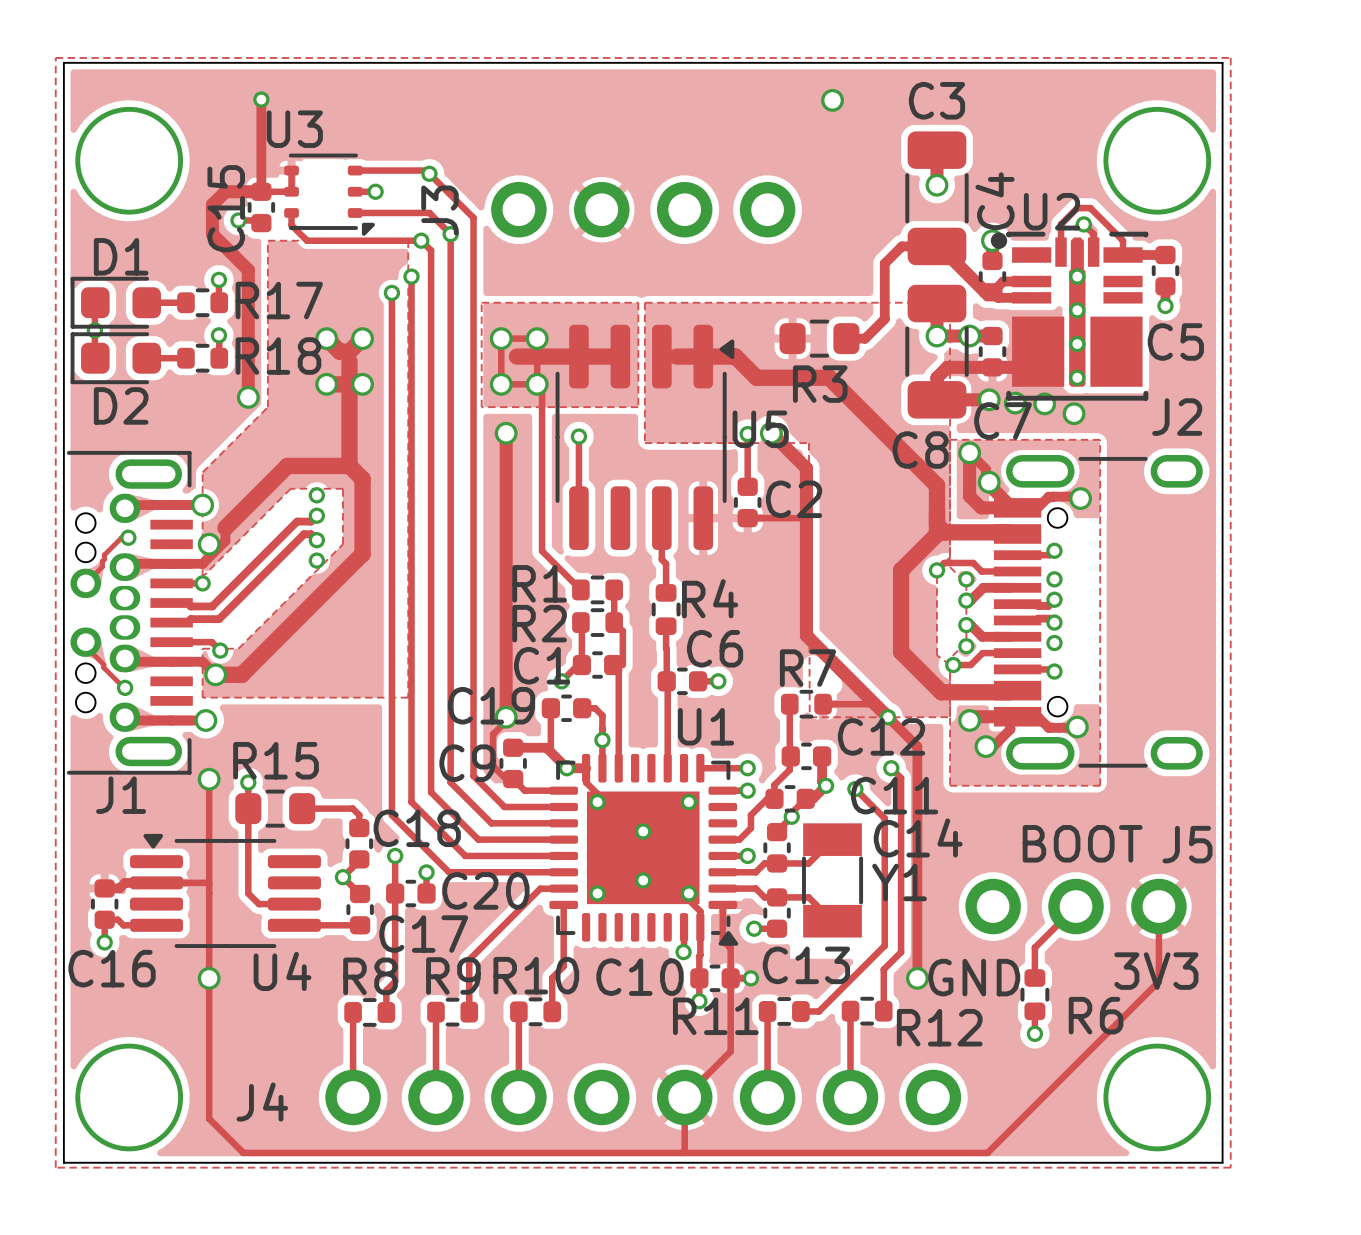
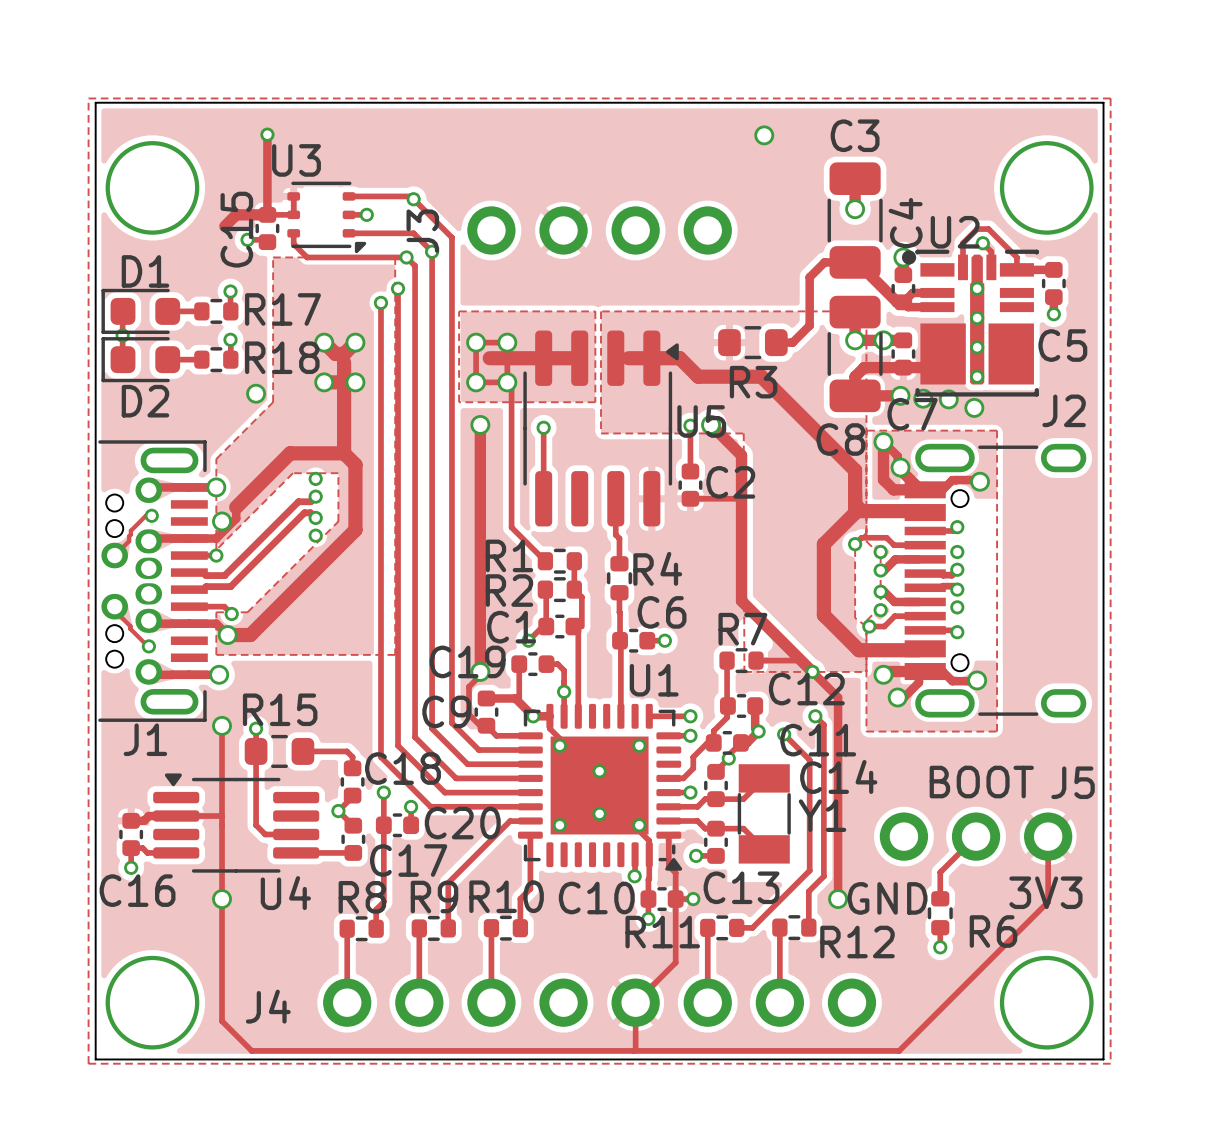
track: (212, 204) (212, 234) (248, 270) (248, 397) -> none

